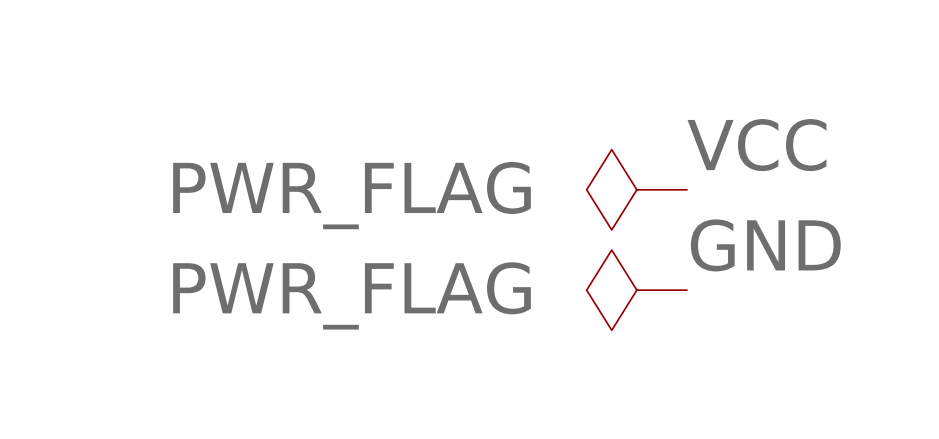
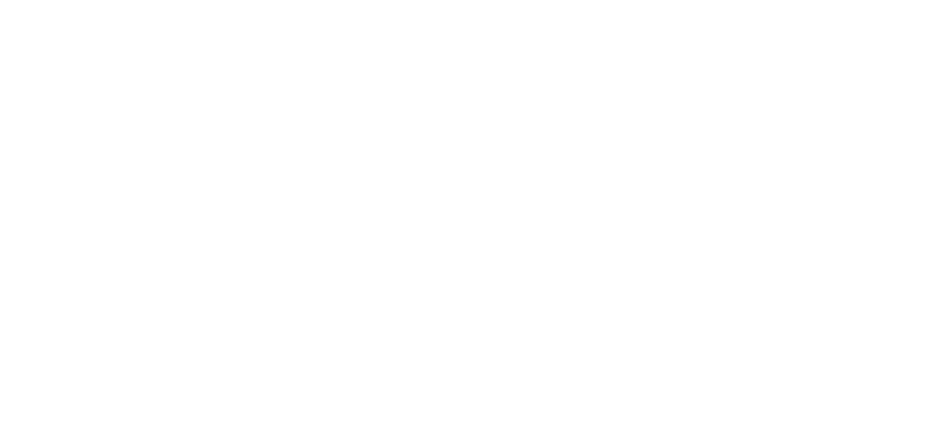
label: VCC (757, 145) -> none
power symbol: PWR_FLAG (636, 189) -> none
label: GND (765, 245) -> none
power symbol: PWR_FLAG (636, 290) -> none

